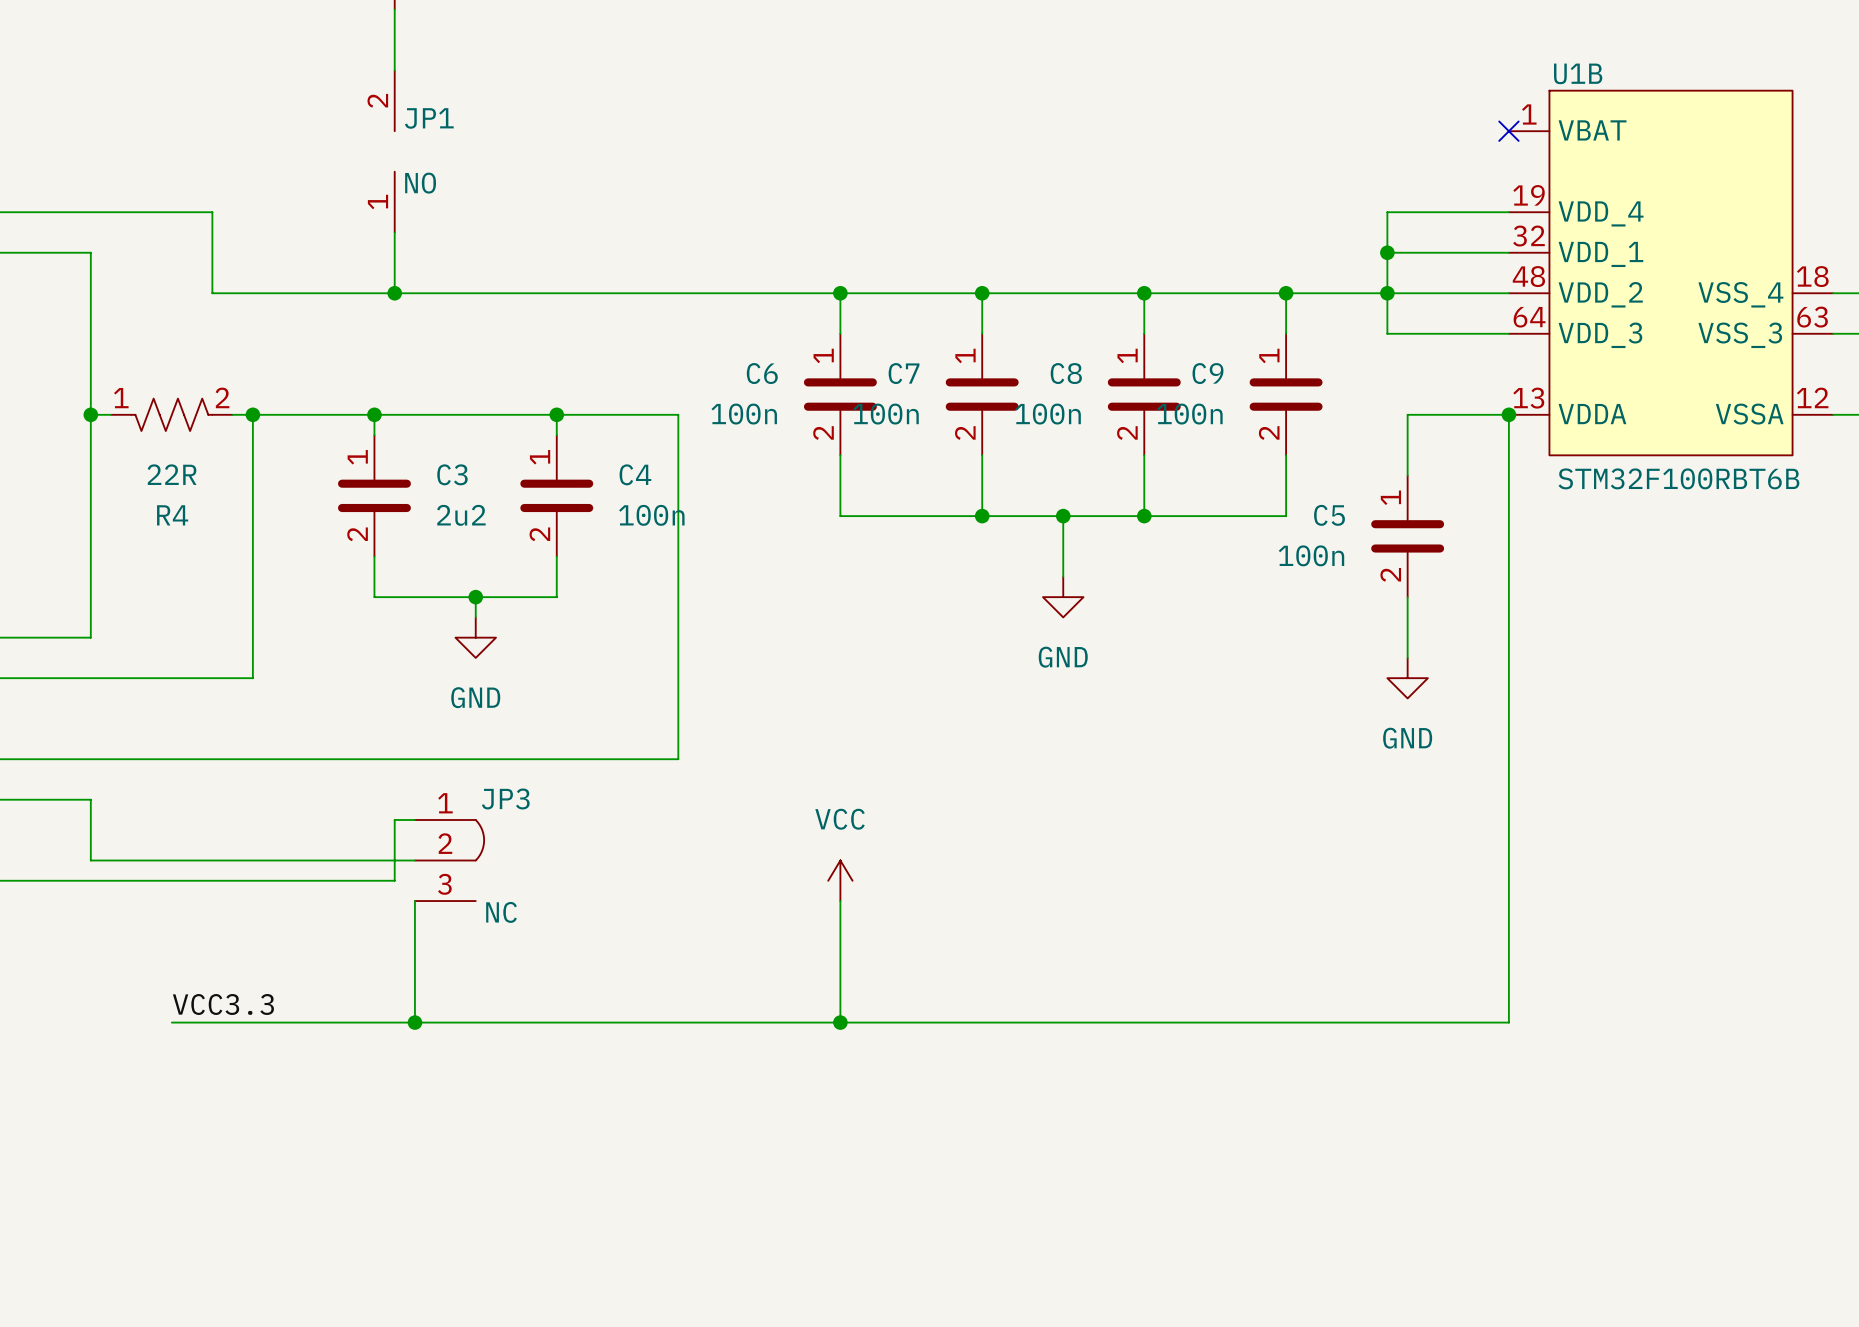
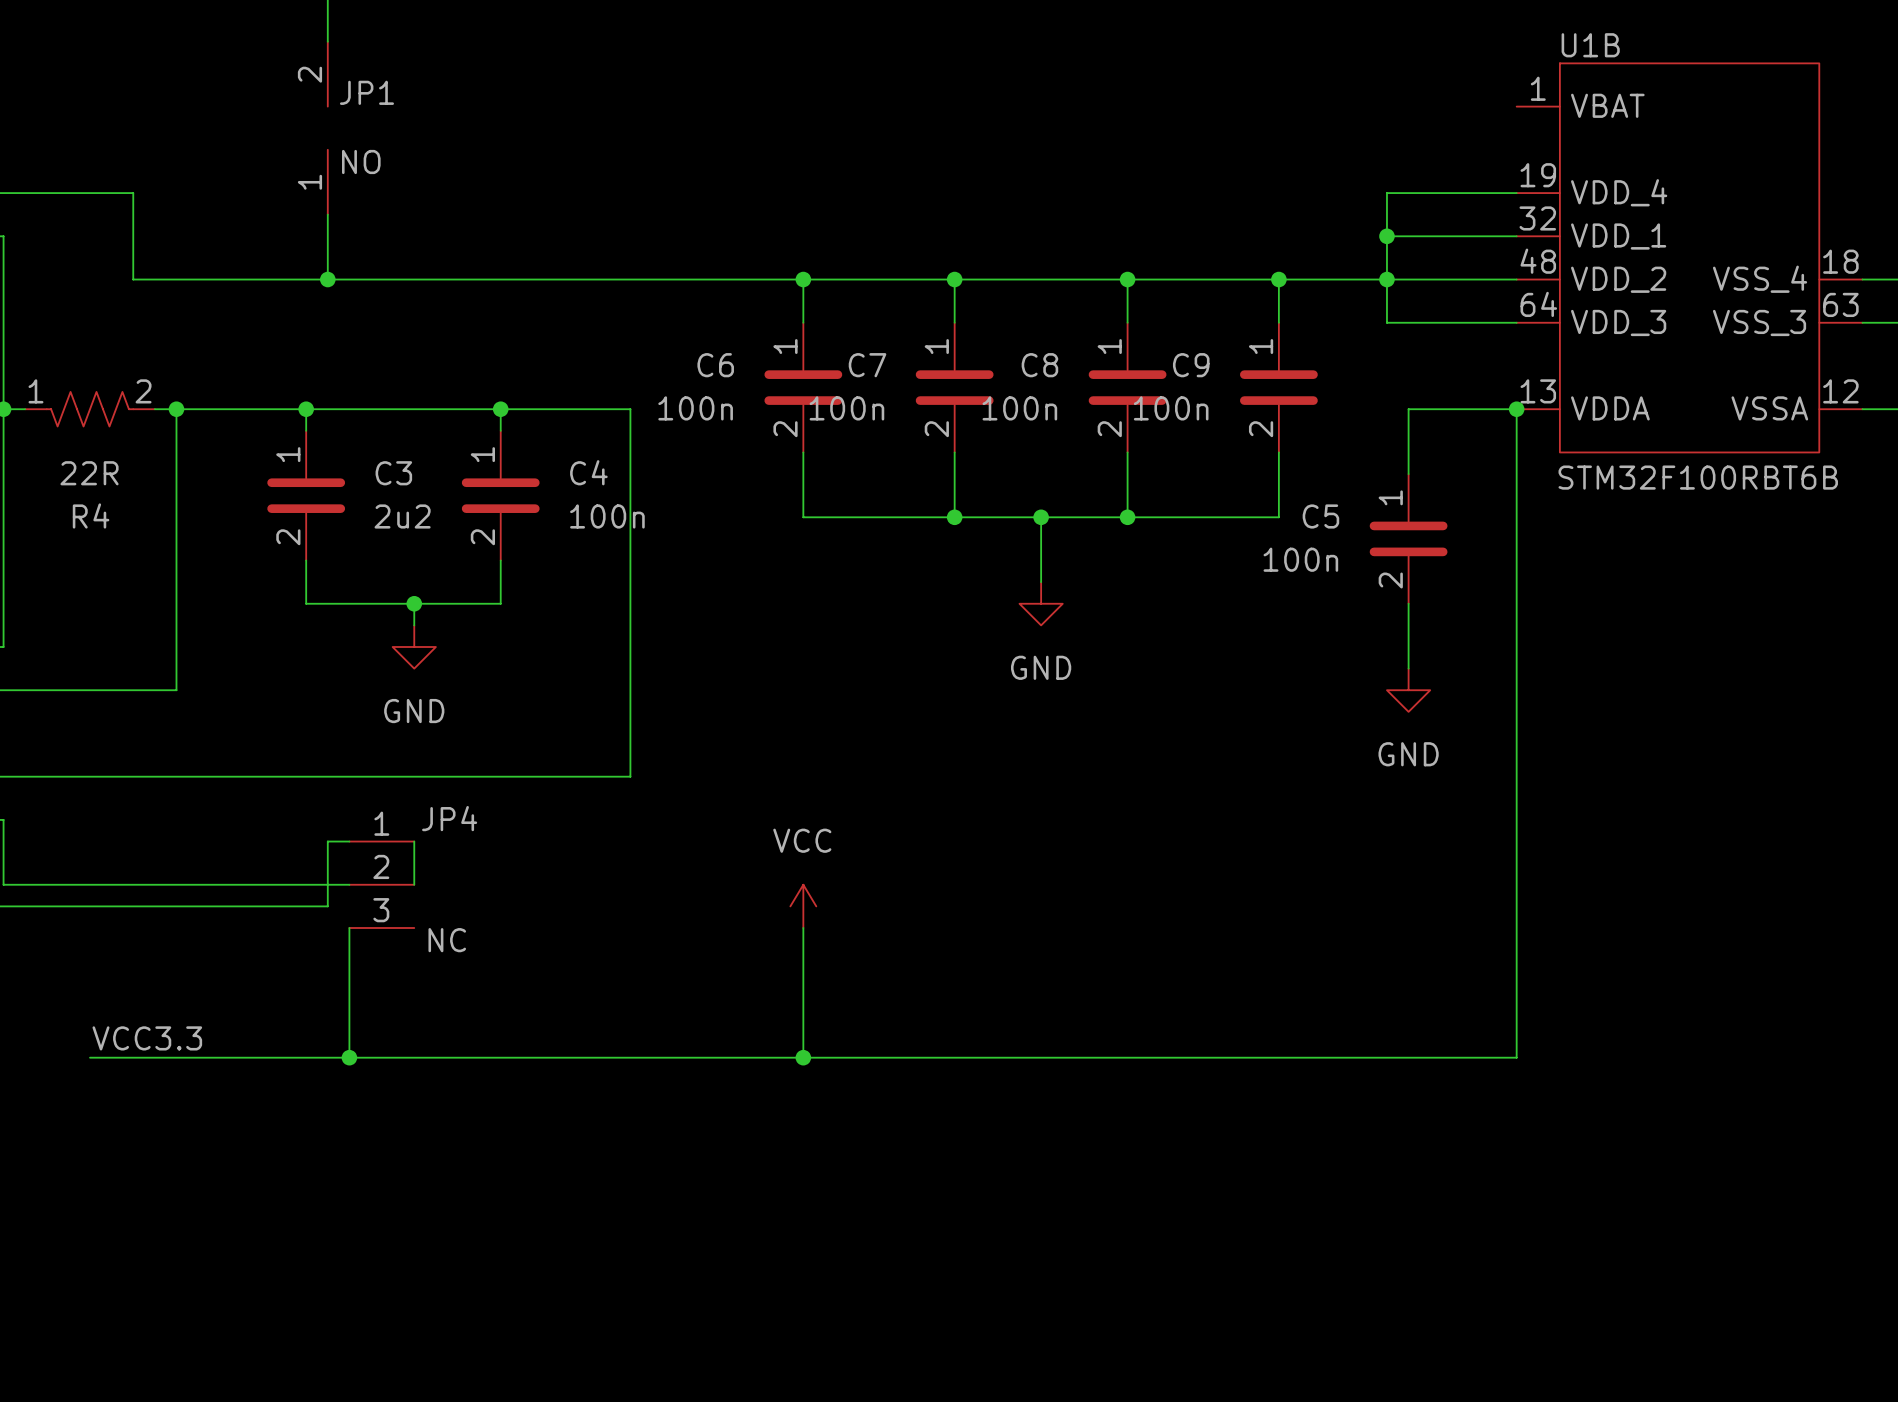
no-connect mark: (1508, 131) -> none
wire: none -> (414, 841) (414, 884)
JP4: none -> (381, 884)
JP3: (449, 860) -> none

